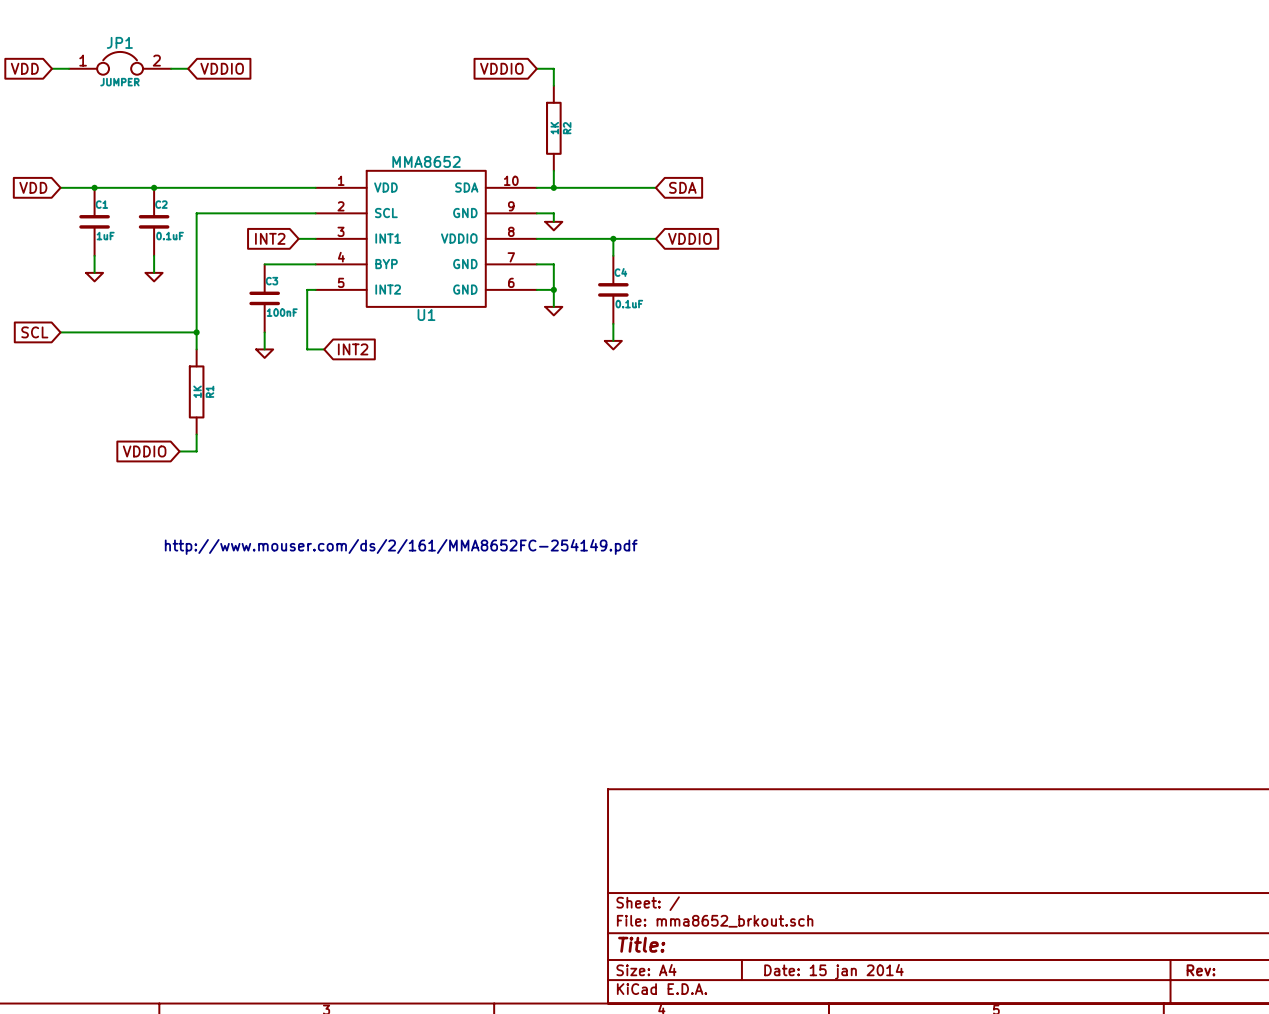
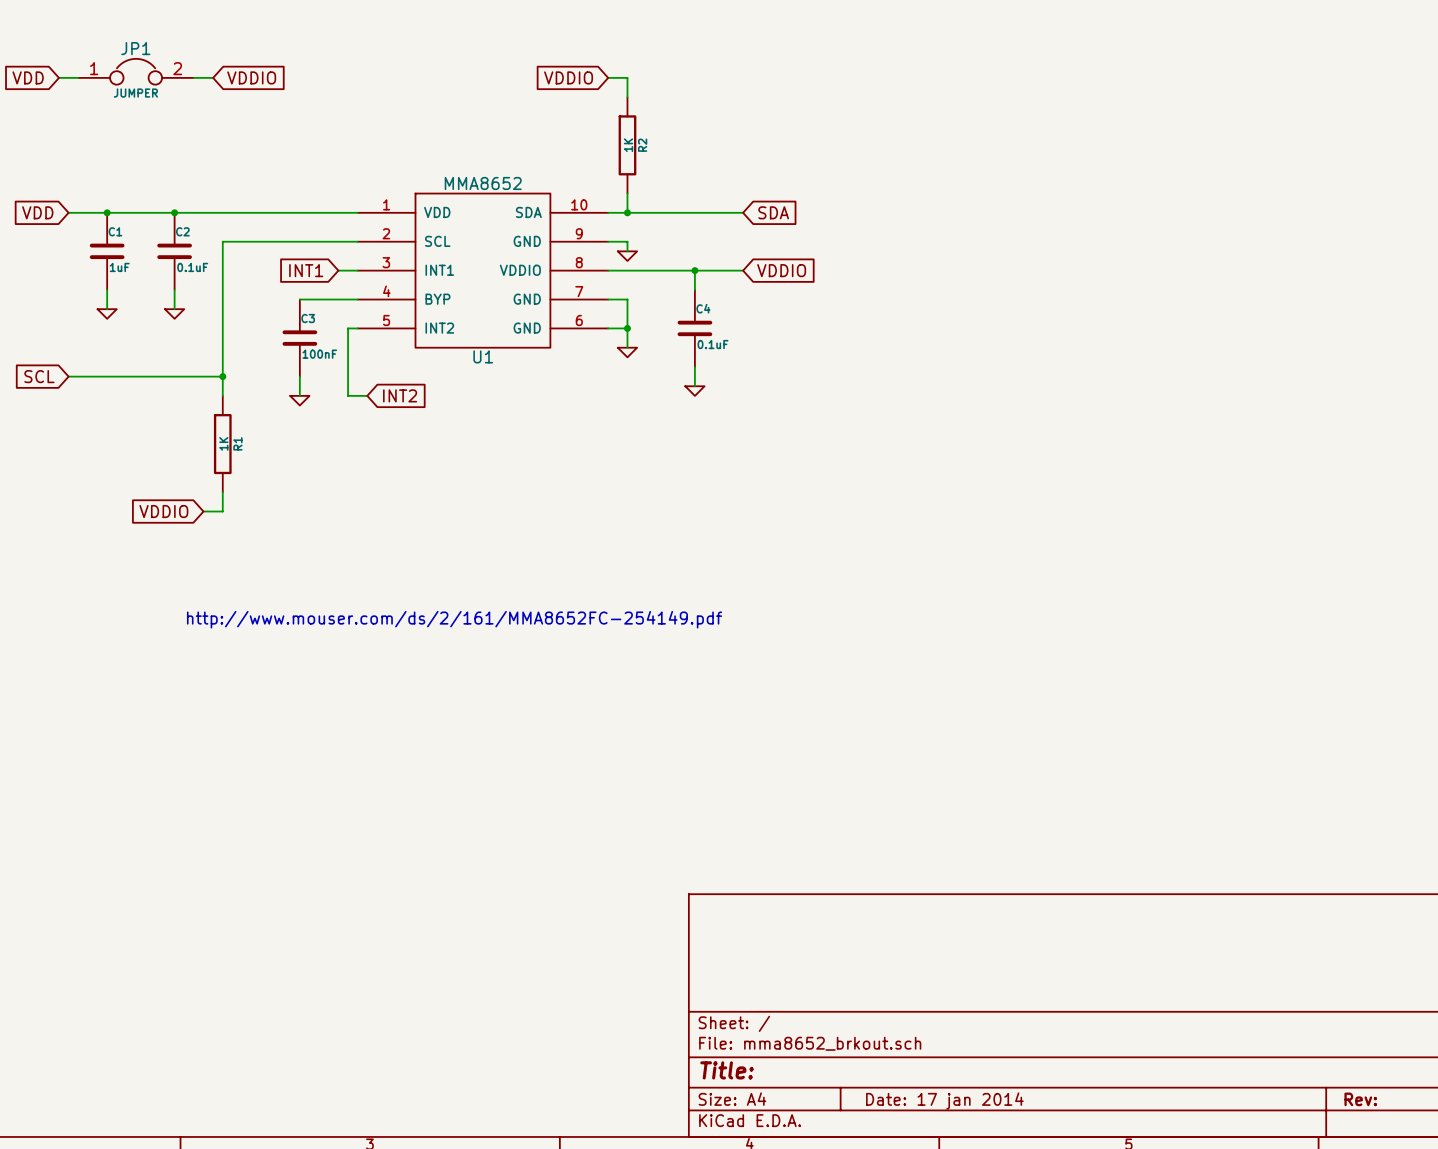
global label: INT2 (270, 238) -> INT1 (306, 270)
title block: Date: 15 jan 2014 (833, 971) -> Date: 17 jan 2014 (944, 1101)

